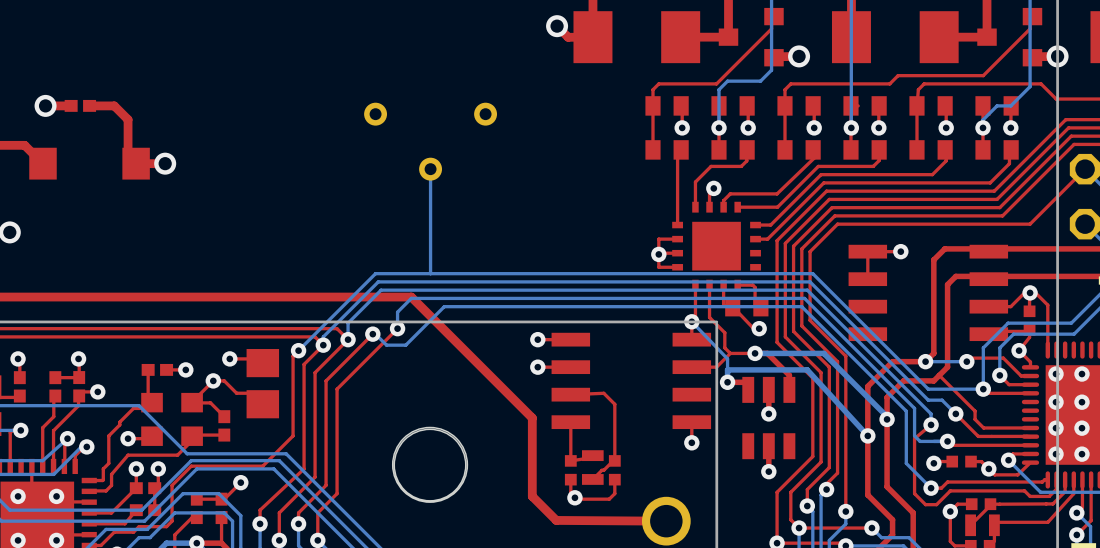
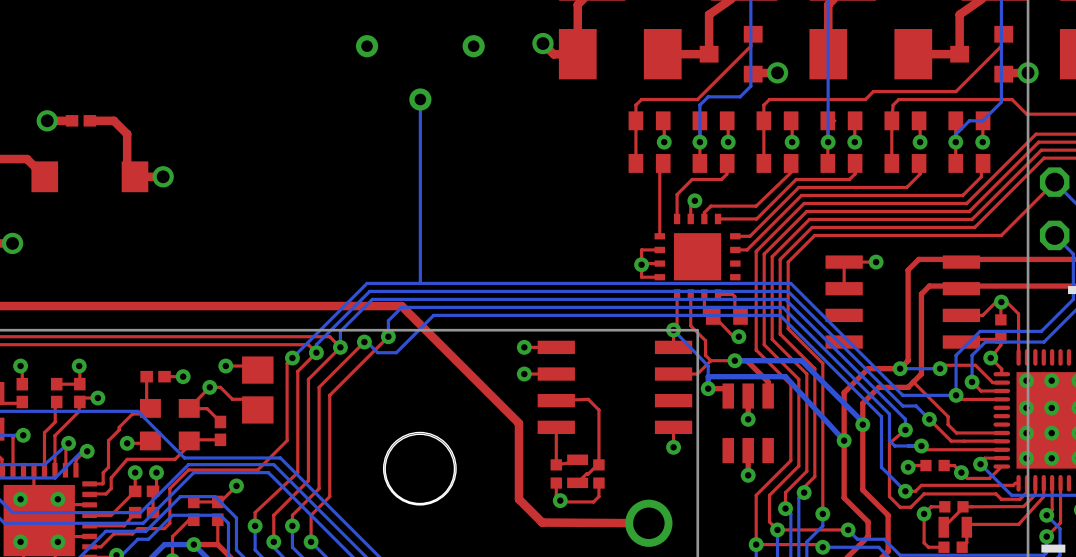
bottom track: none -> (420, 99) (420, 182)
part position: (430, 141) -> (420, 72)

